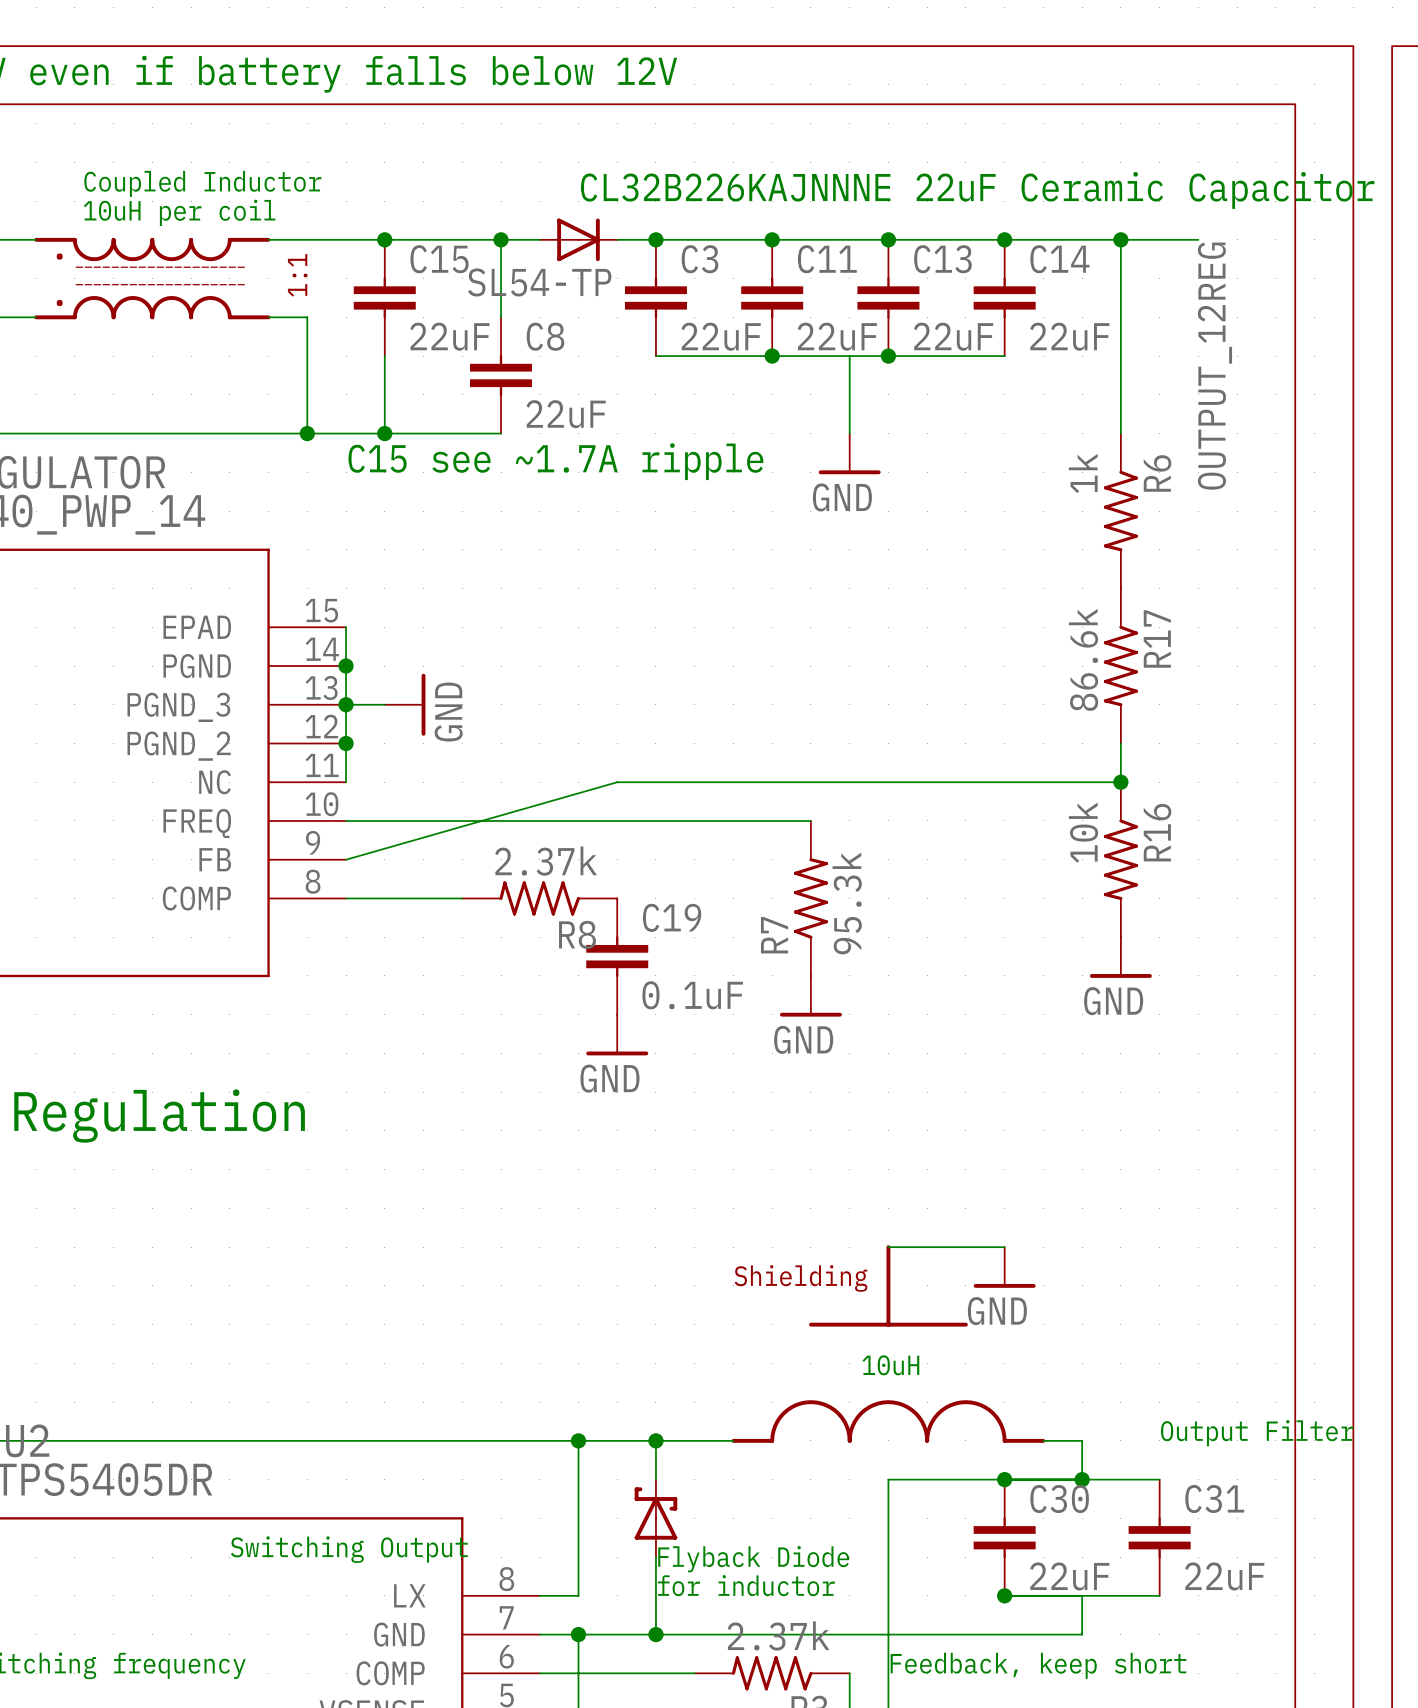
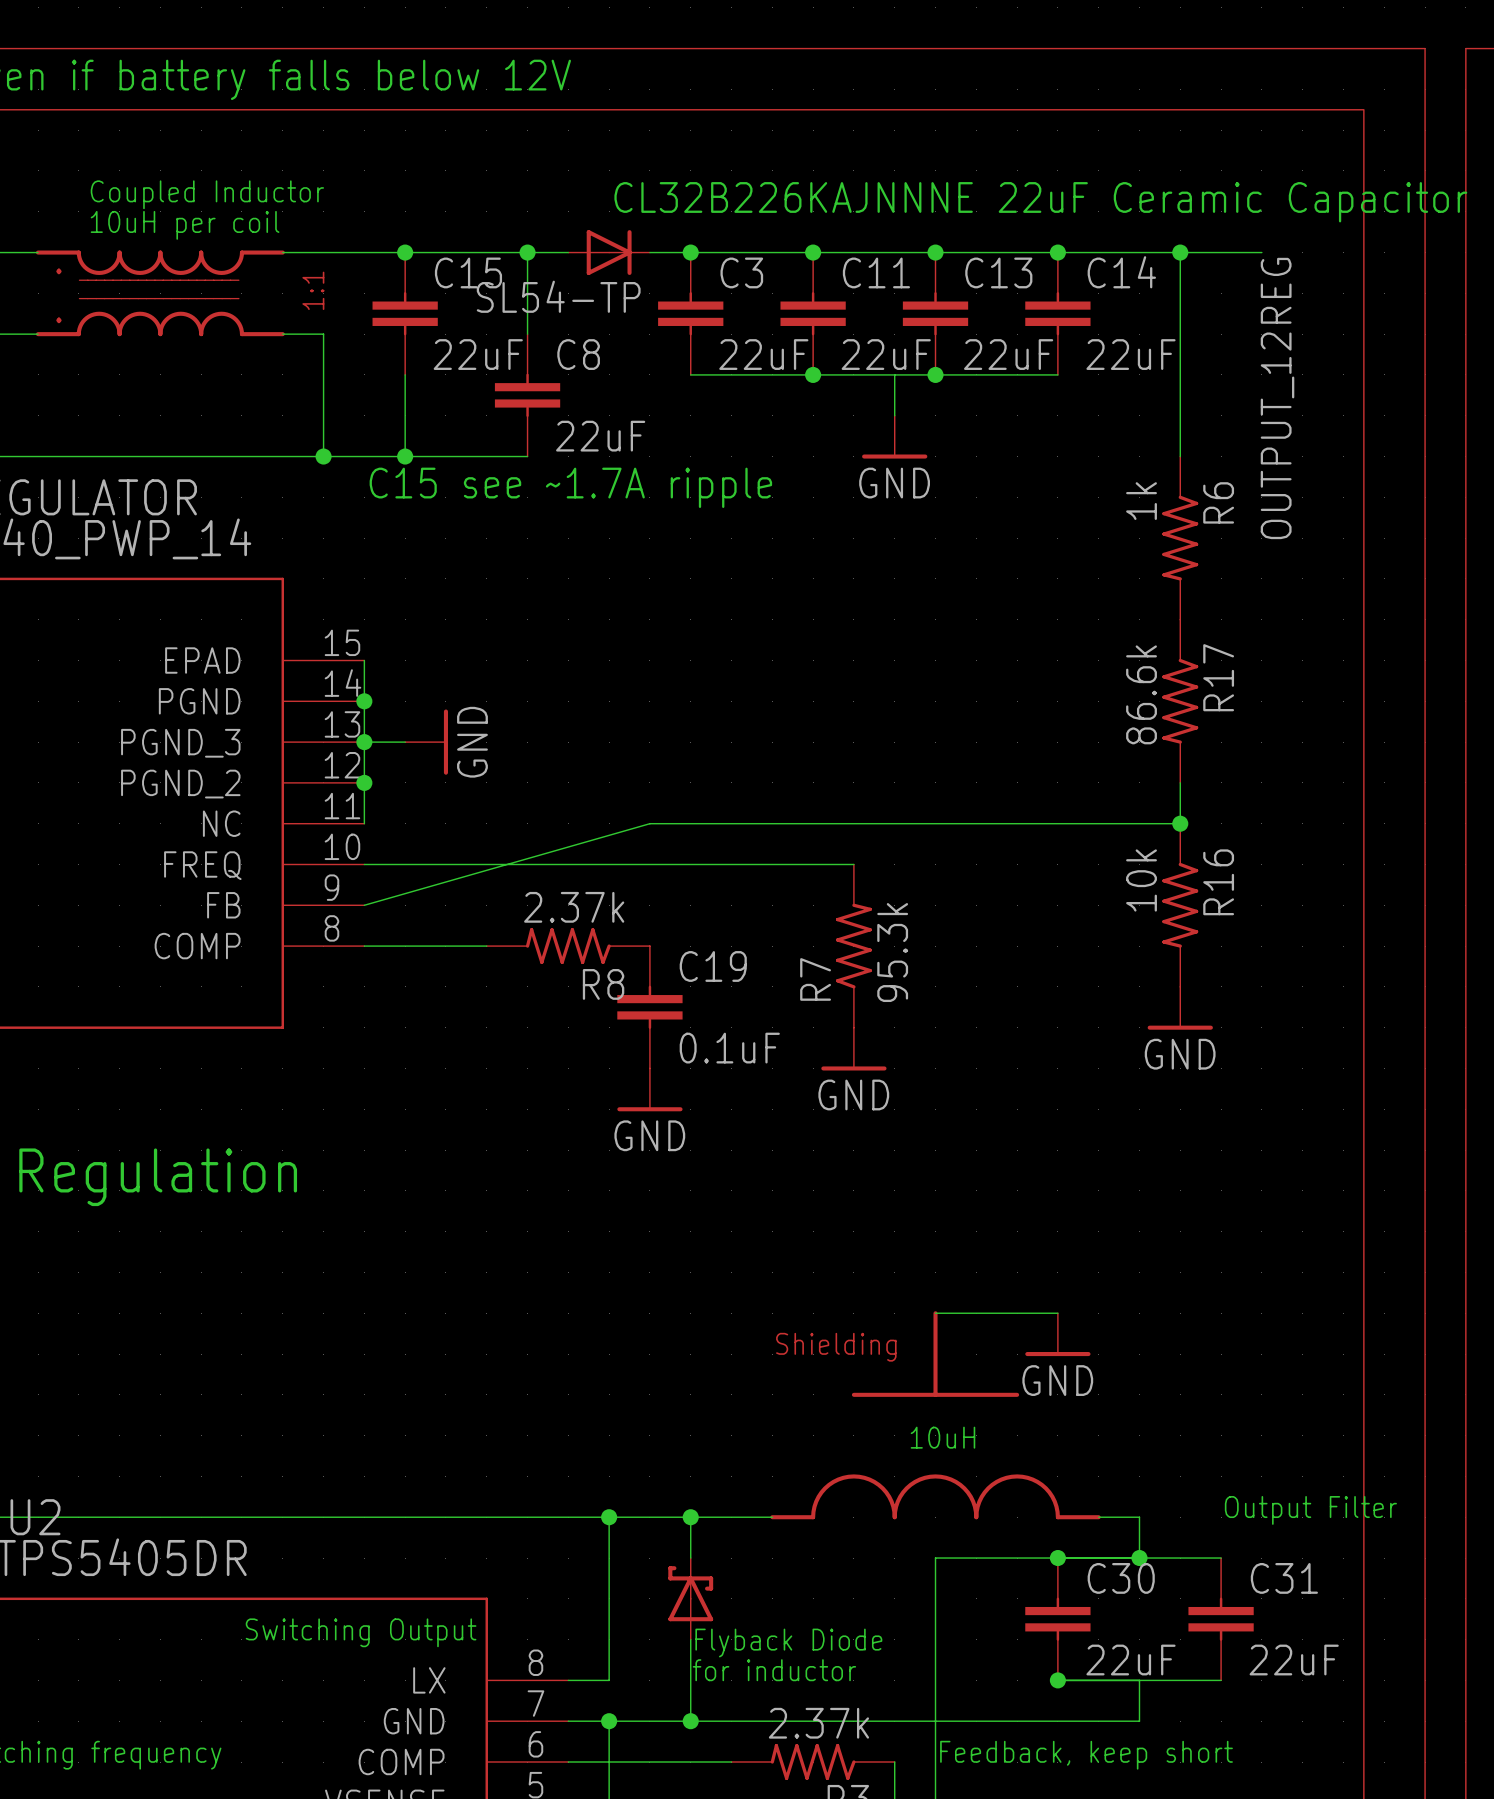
power symbol position: GND (849, 453) -> GND (894, 437)

